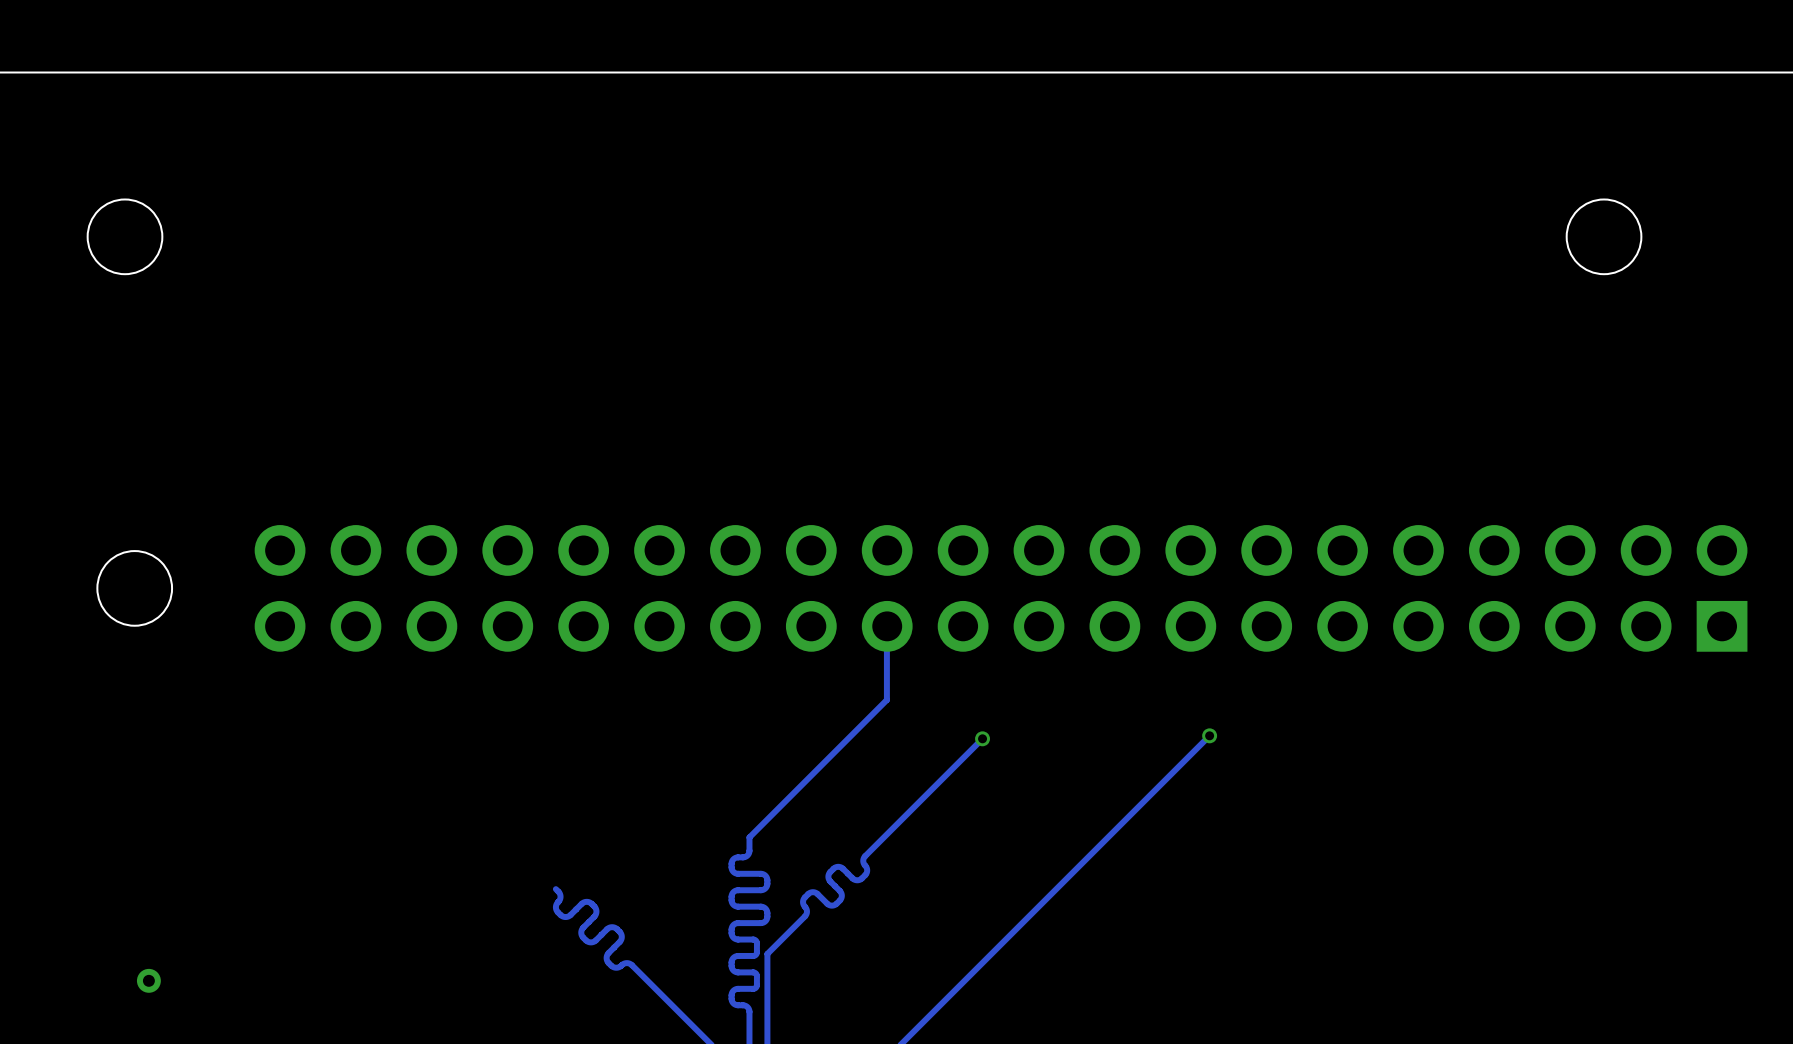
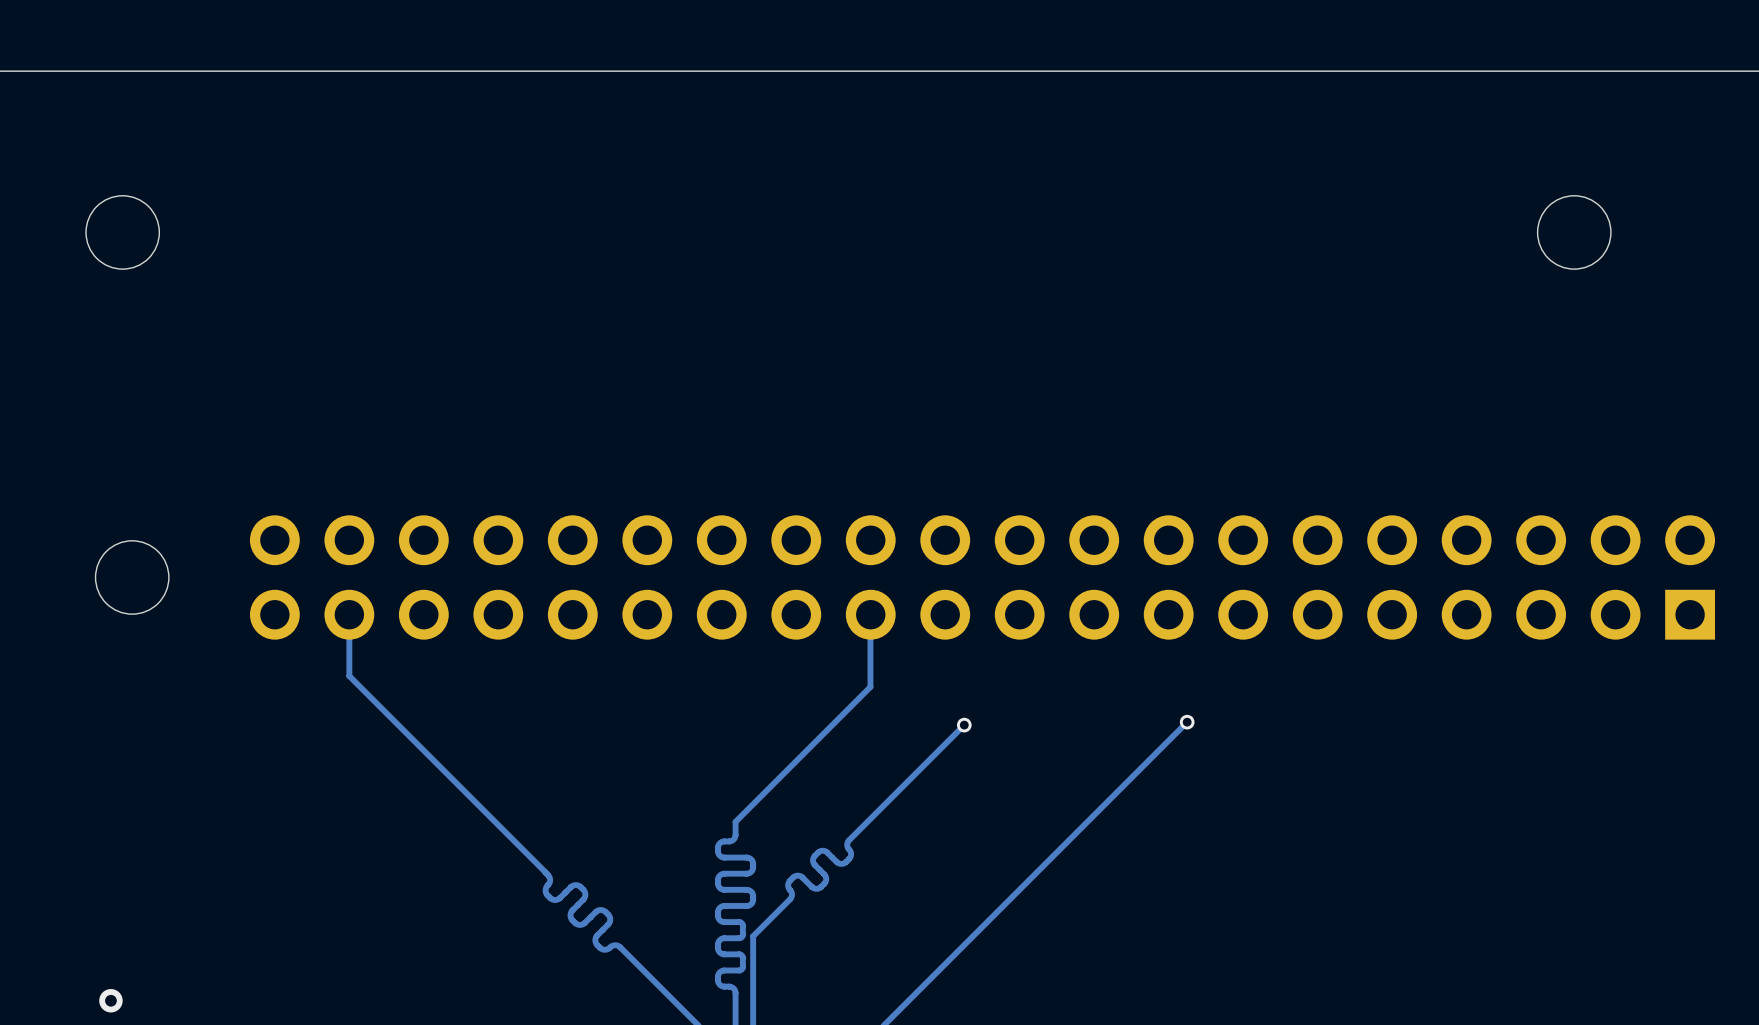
track: none -> (349, 614) (349, 676) (545, 872)
via position: (148, 980) -> (110, 1000)

